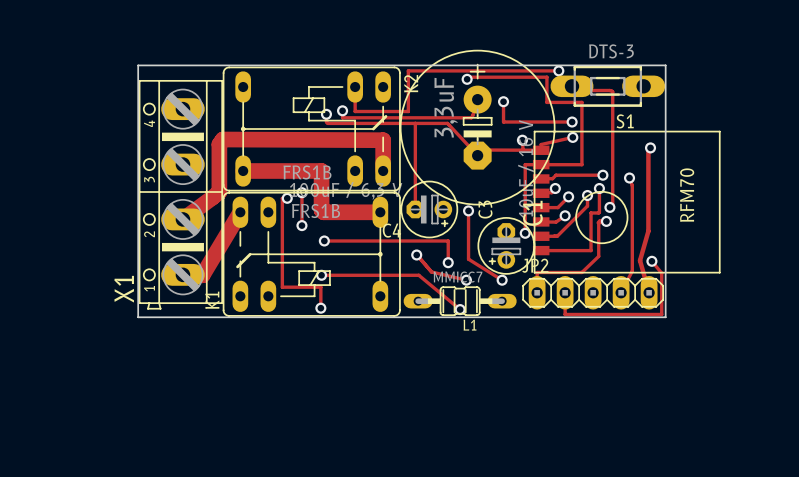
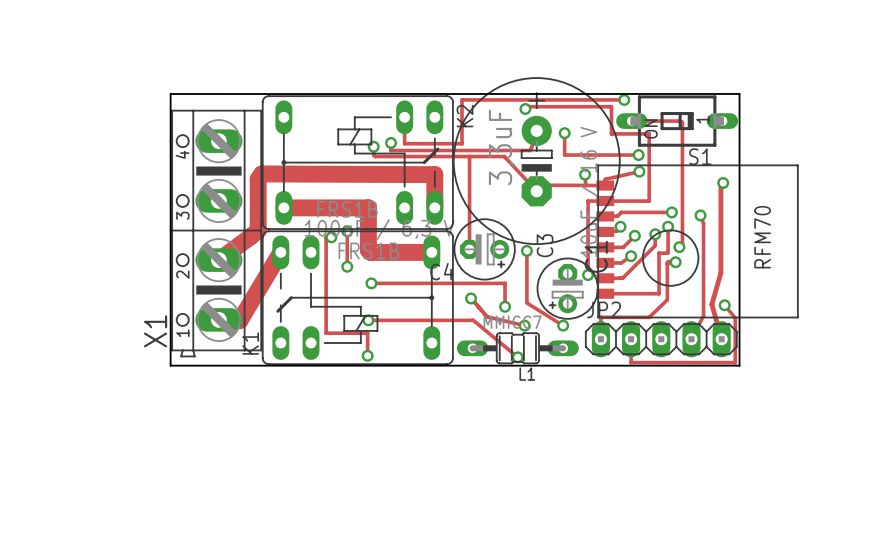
S1 value: DTS-3 (611, 51) -> none
S1 footprint: [550, 65, 666, 107] -> [616, 95, 739, 147]

